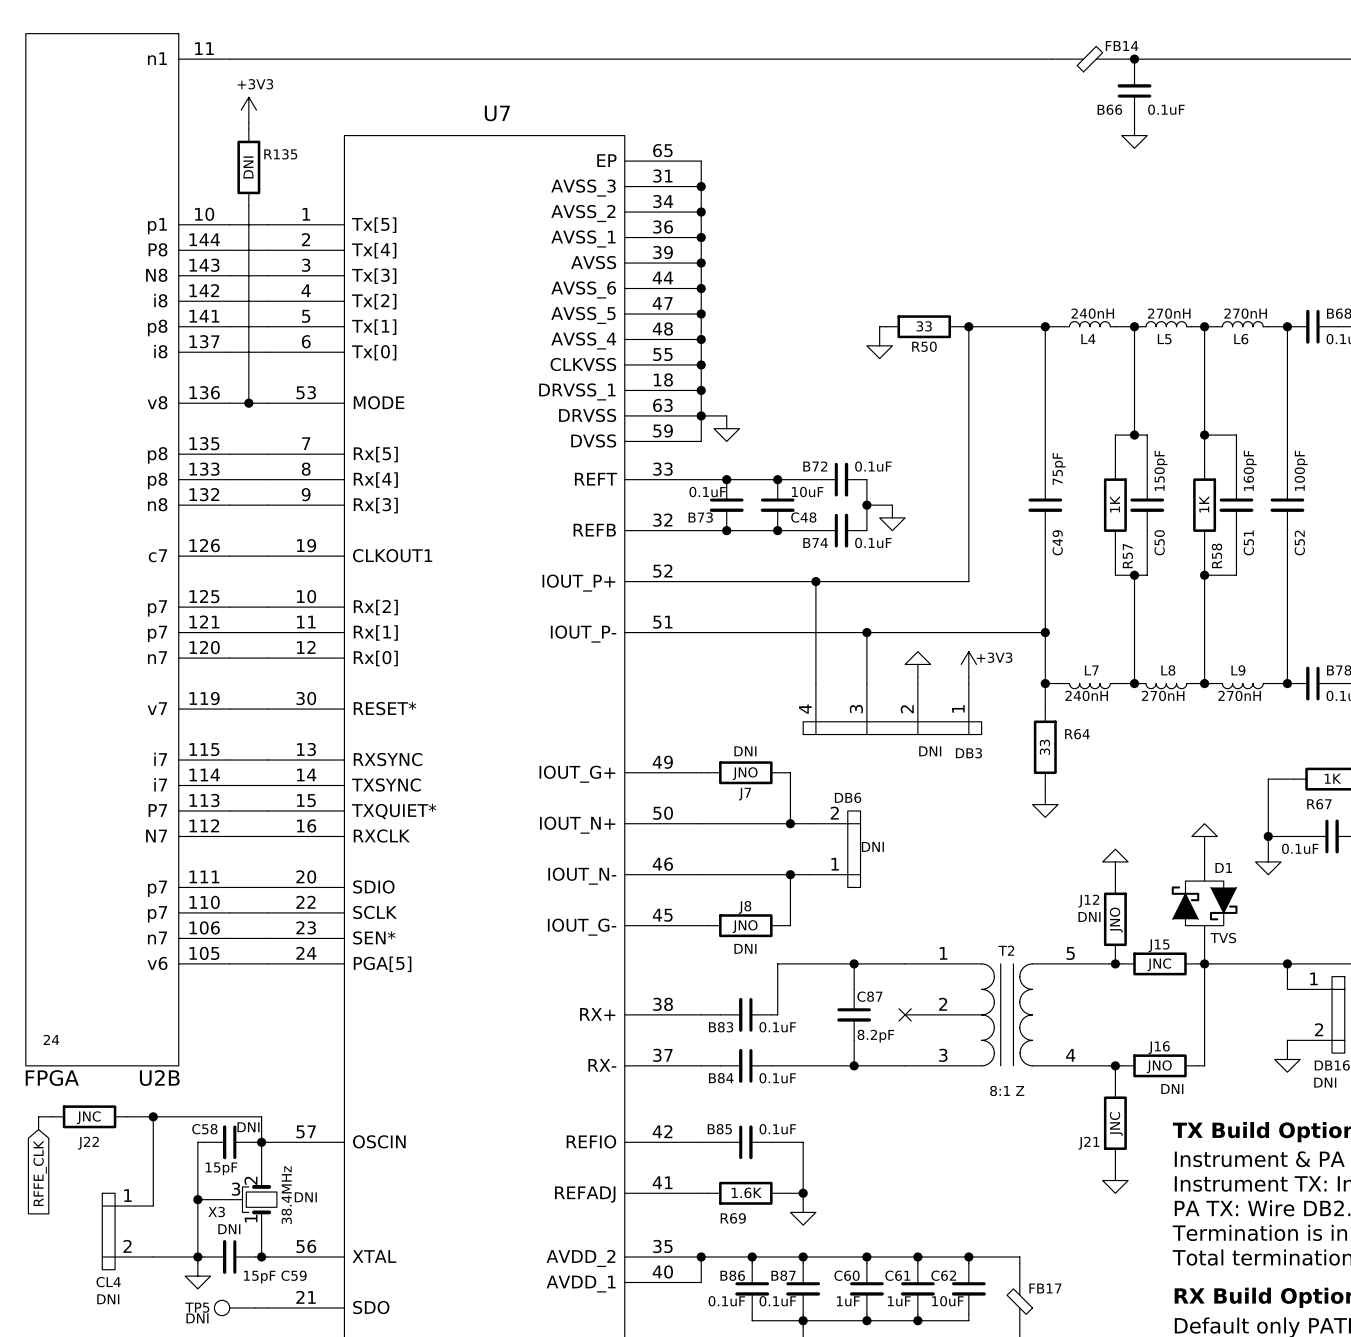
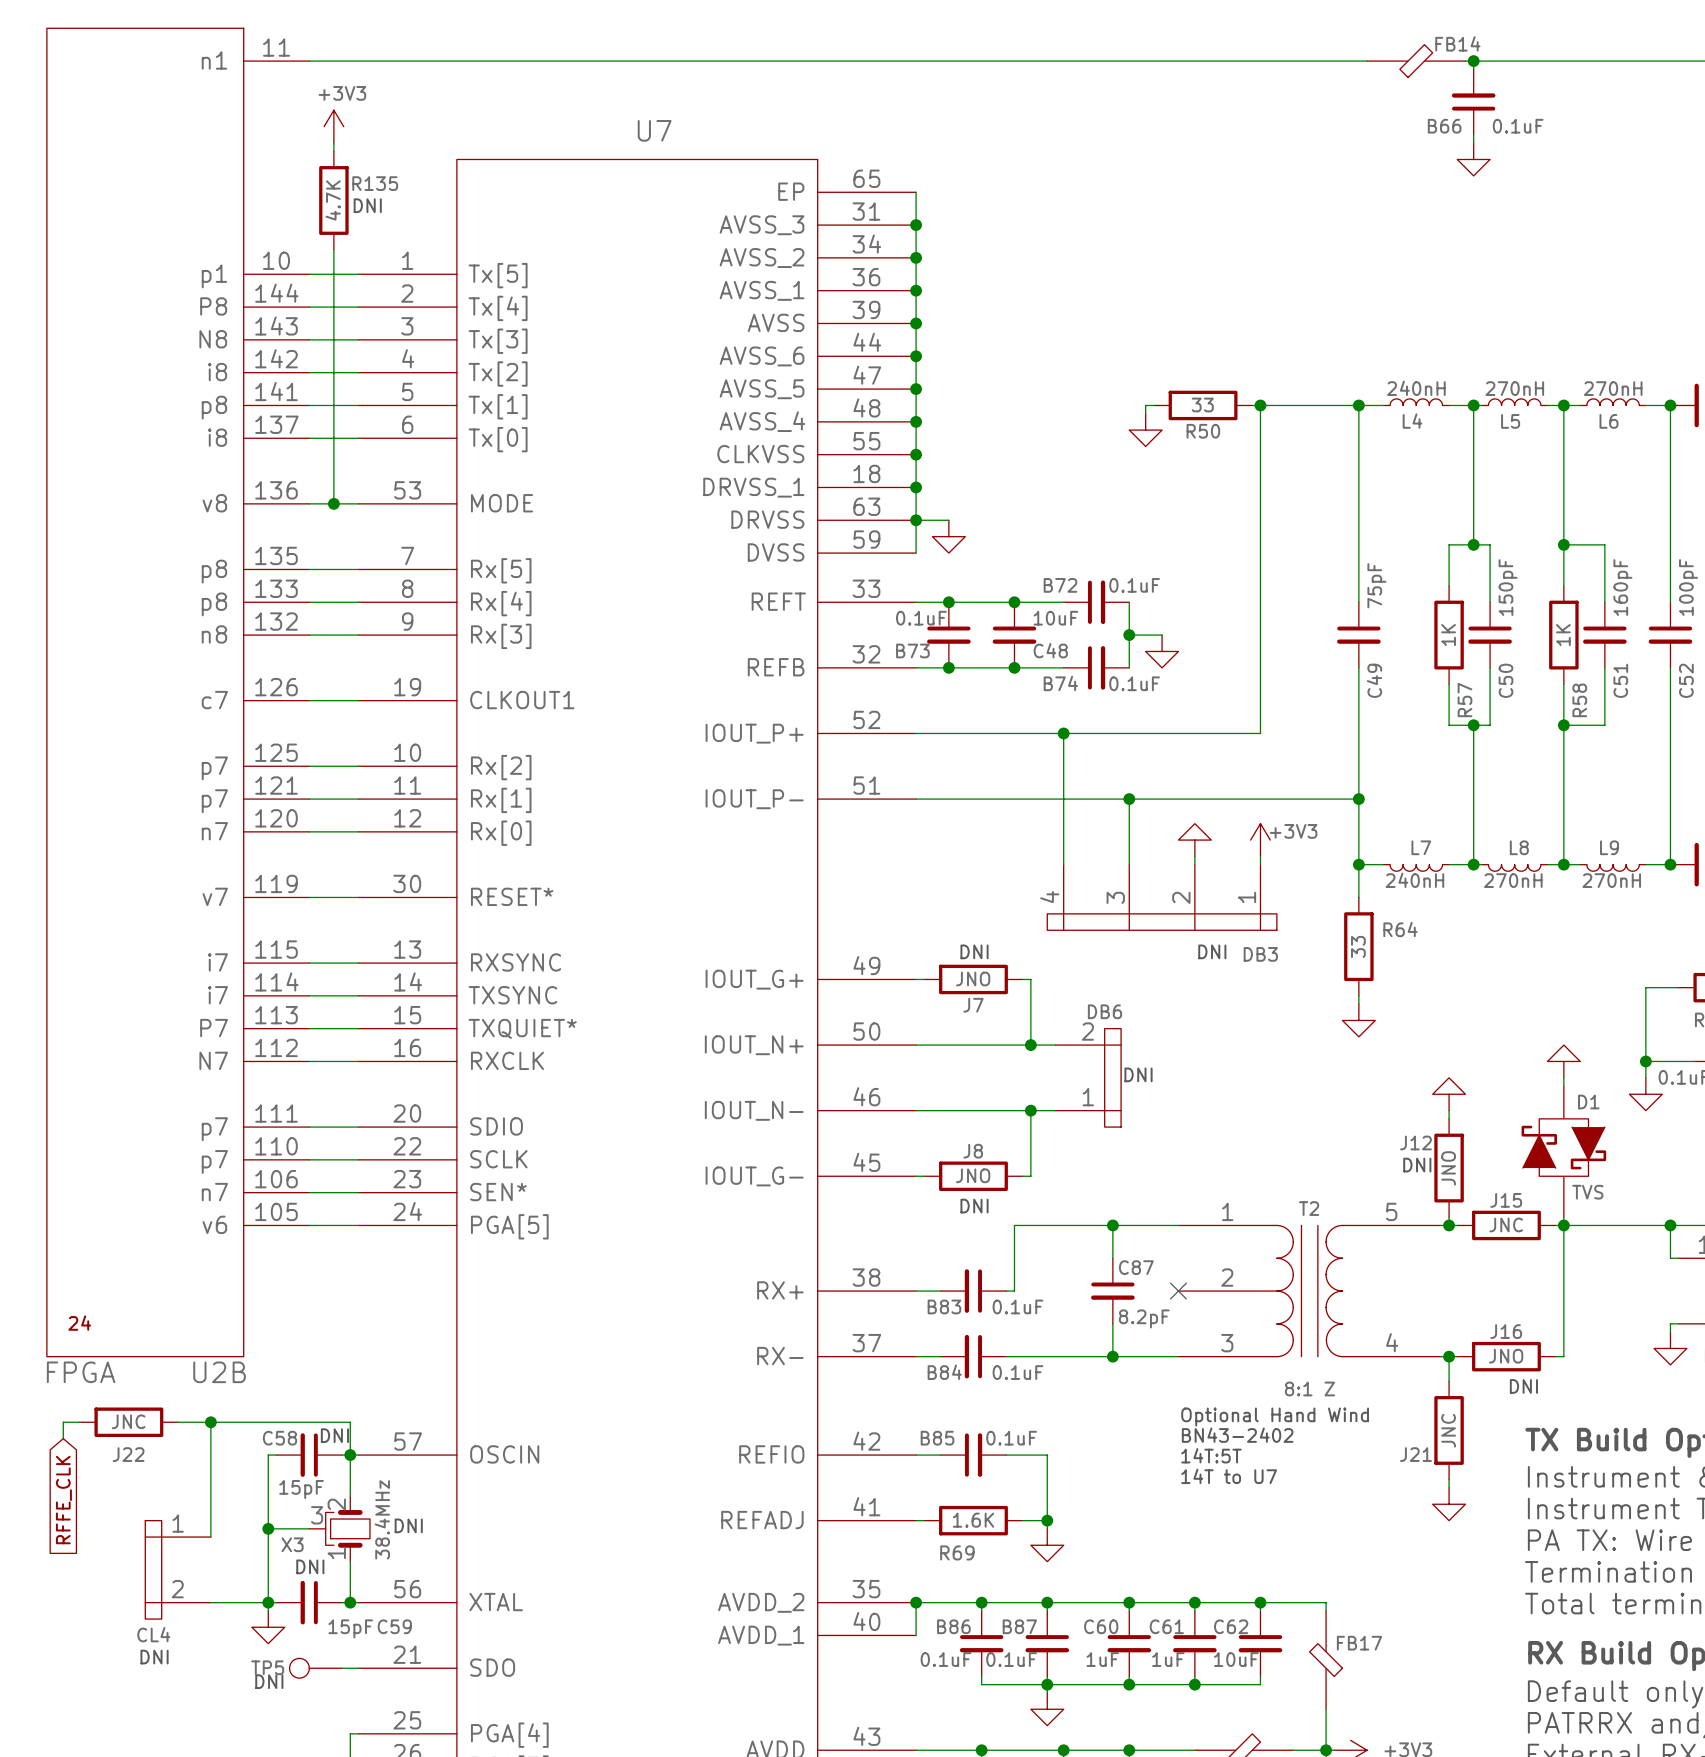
R135 value: DNI (248, 167) -> 4.7K (333, 200)
text: none -> DNI (367, 205)
text: none -> Optional Hand Wind (1275, 1417)
text: none -> BN43-2402 (1237, 1435)
text: none -> 14T:5T (1211, 1455)
text: none -> 14T to U7 (1229, 1476)

